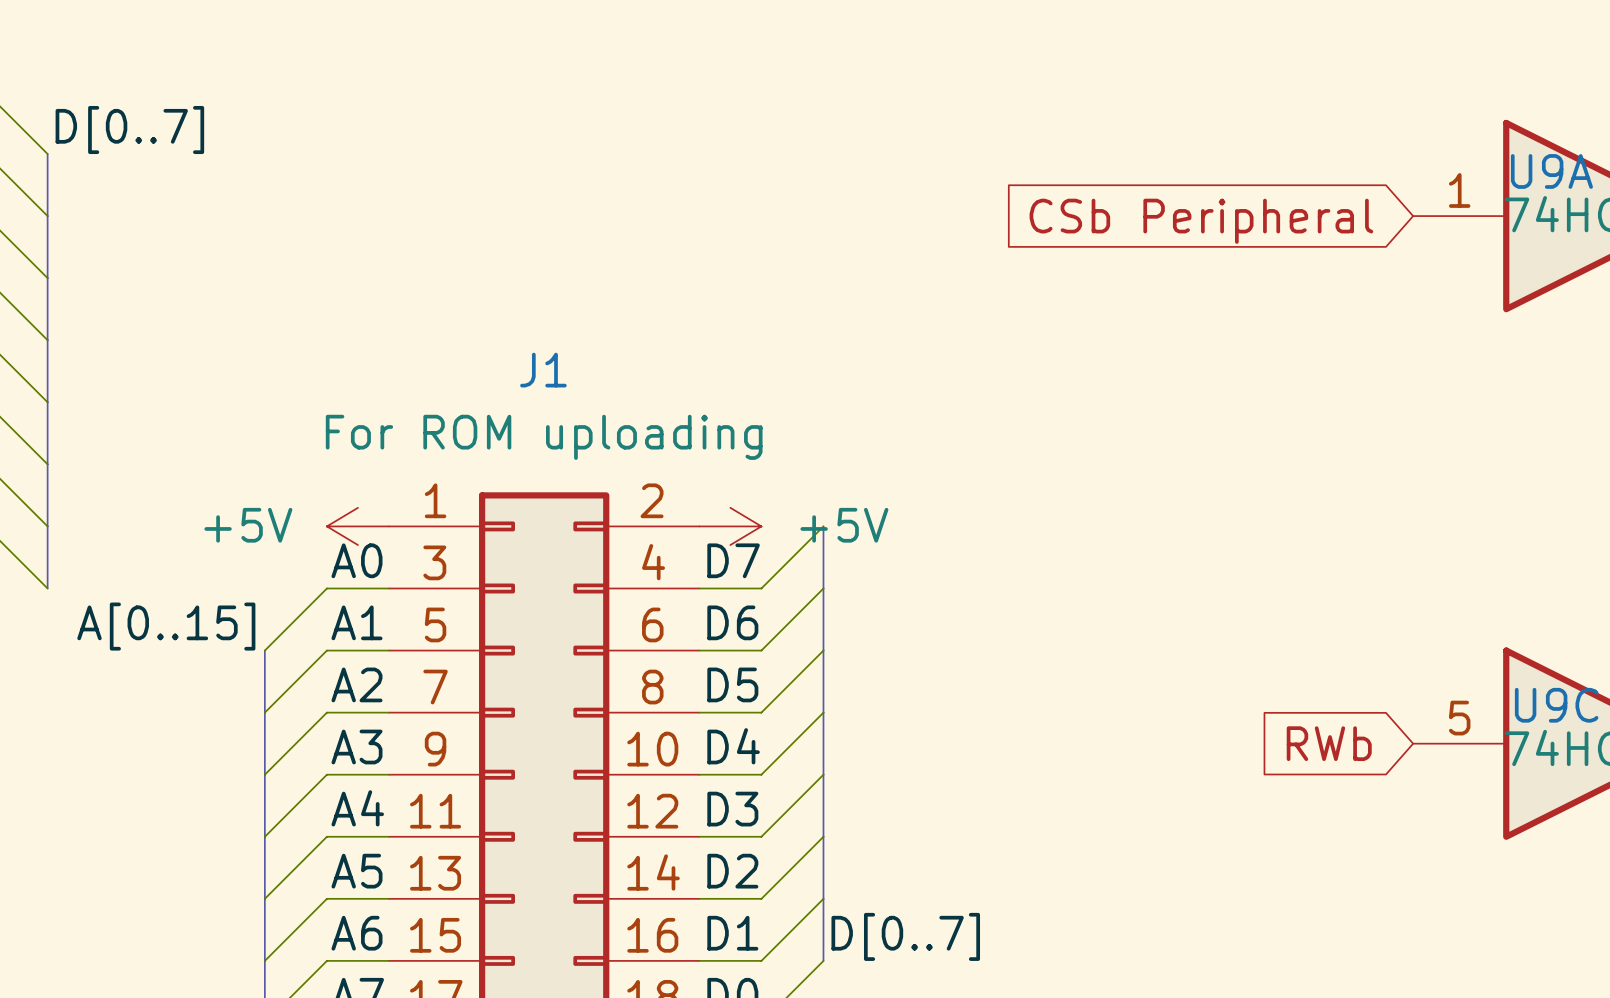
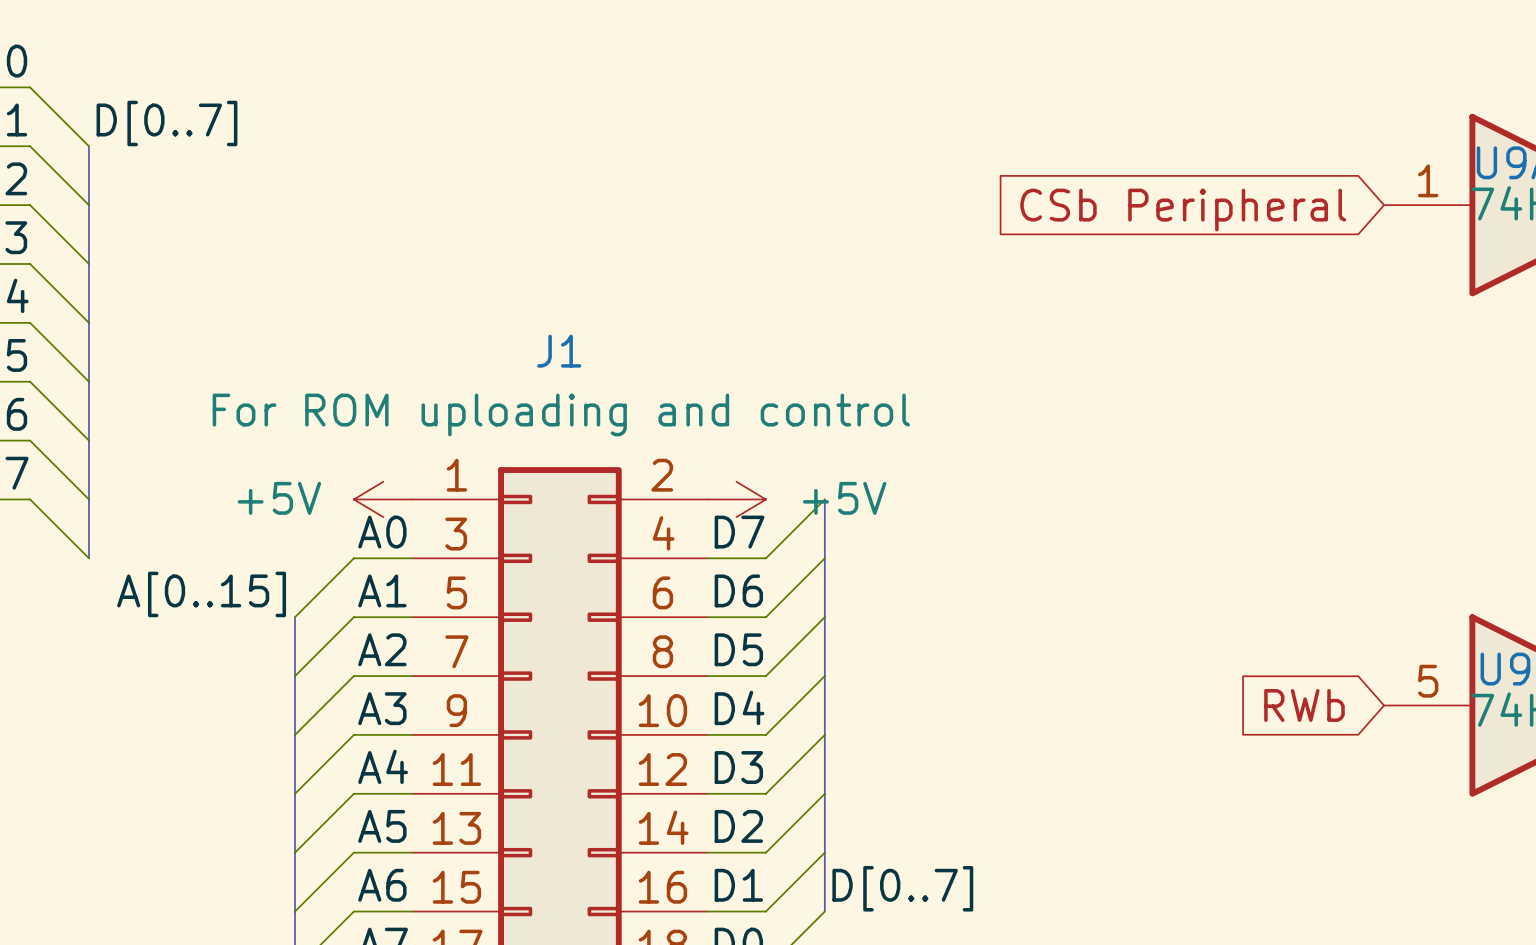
J1 value: For ROM uploading (544, 437) -> For ROM uploading and control (561, 414)

